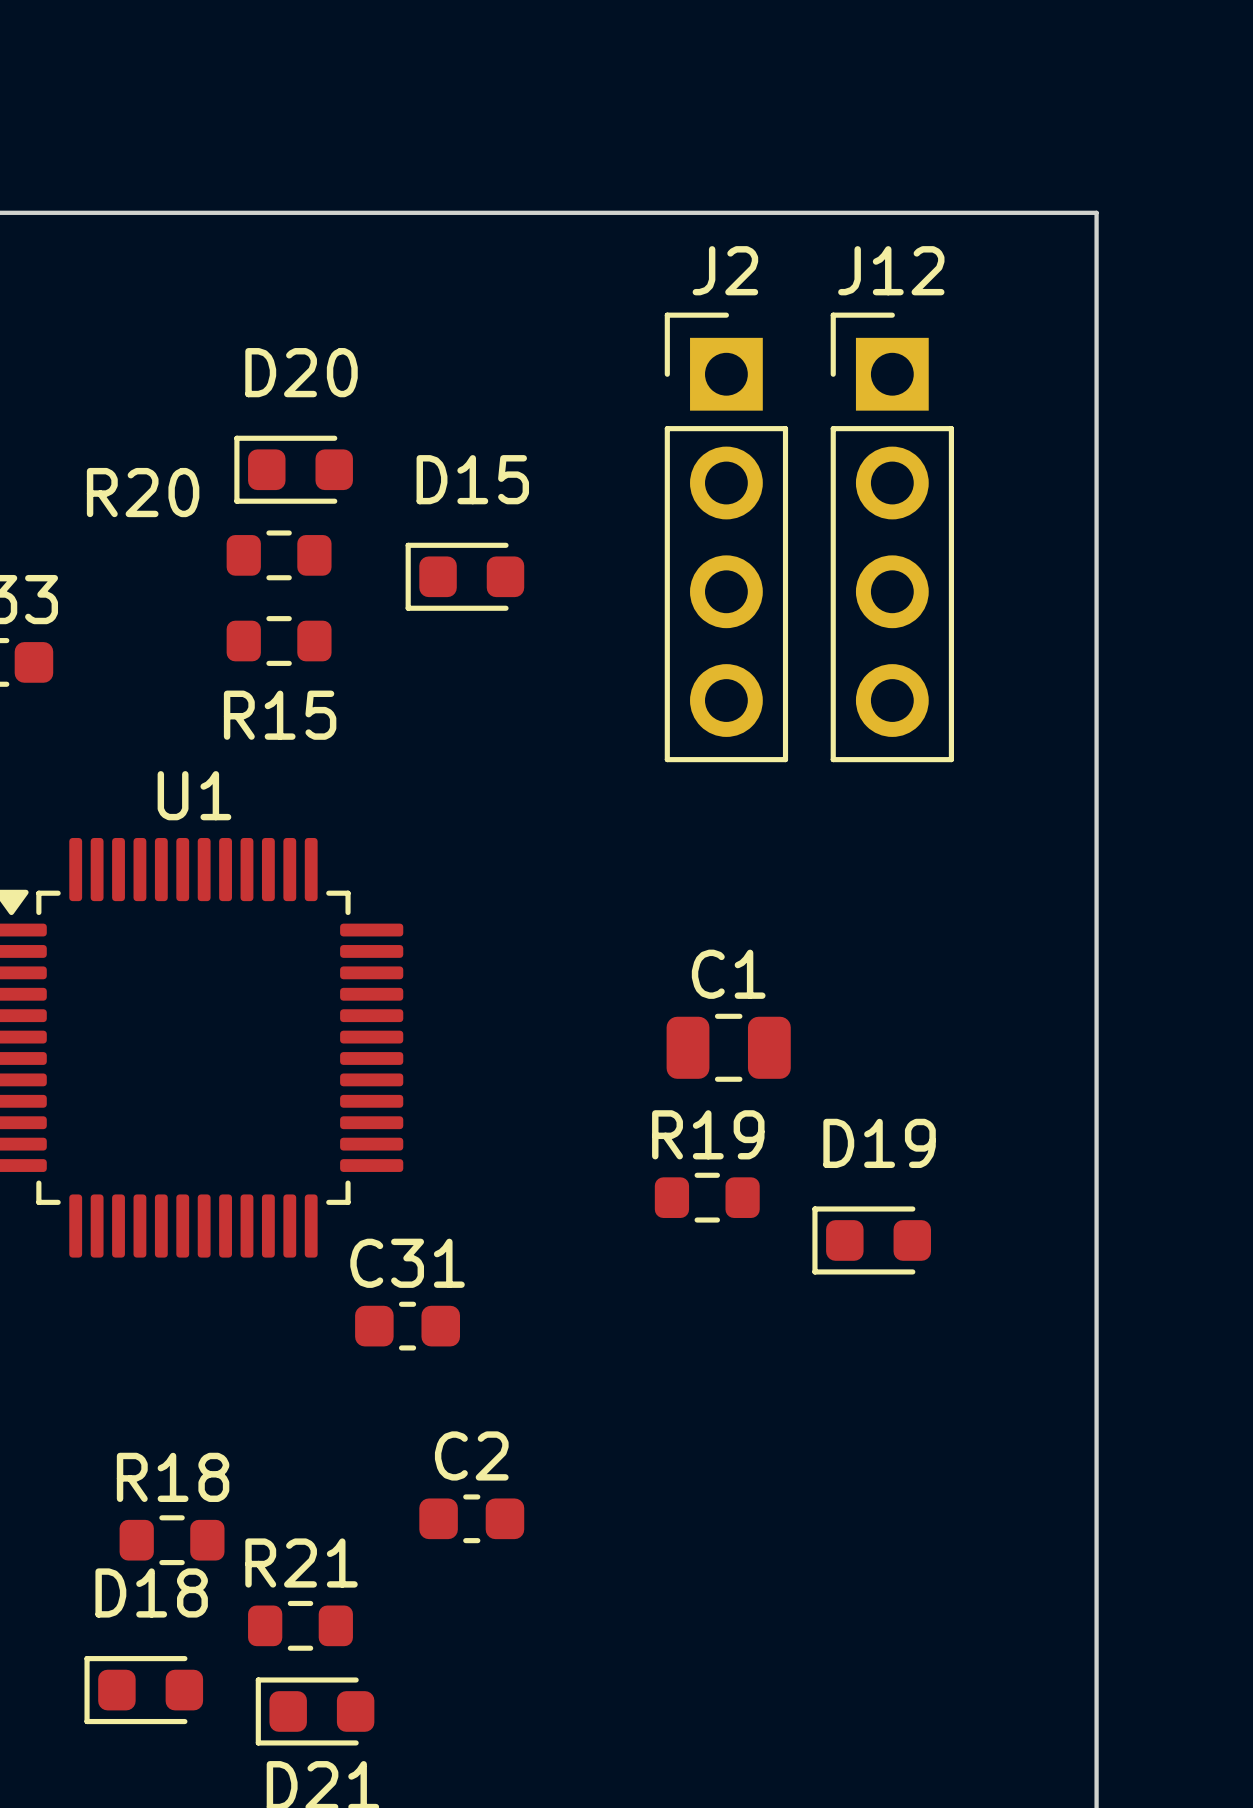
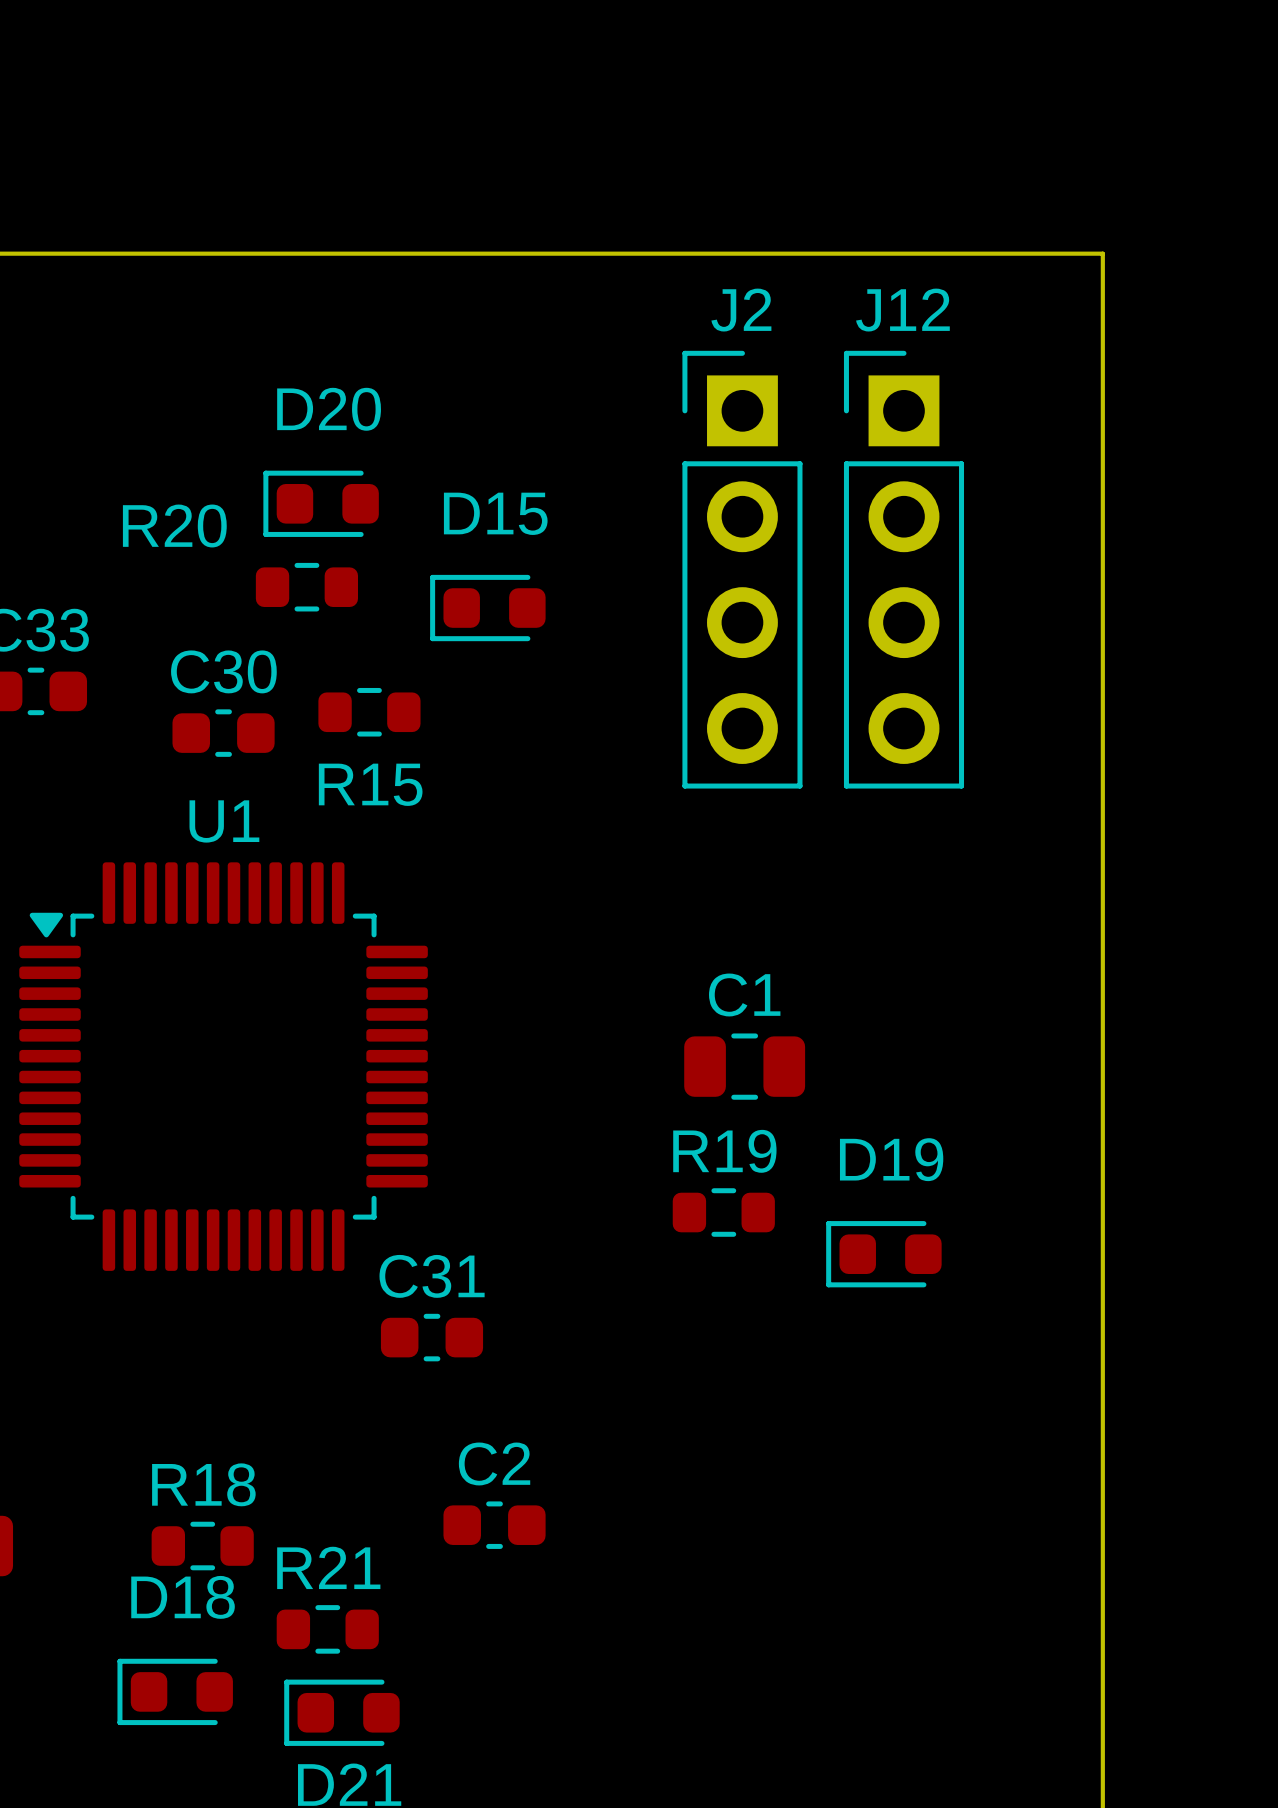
R15 position: (279, 641) -> (369, 712)
C30: none -> (223, 733)

